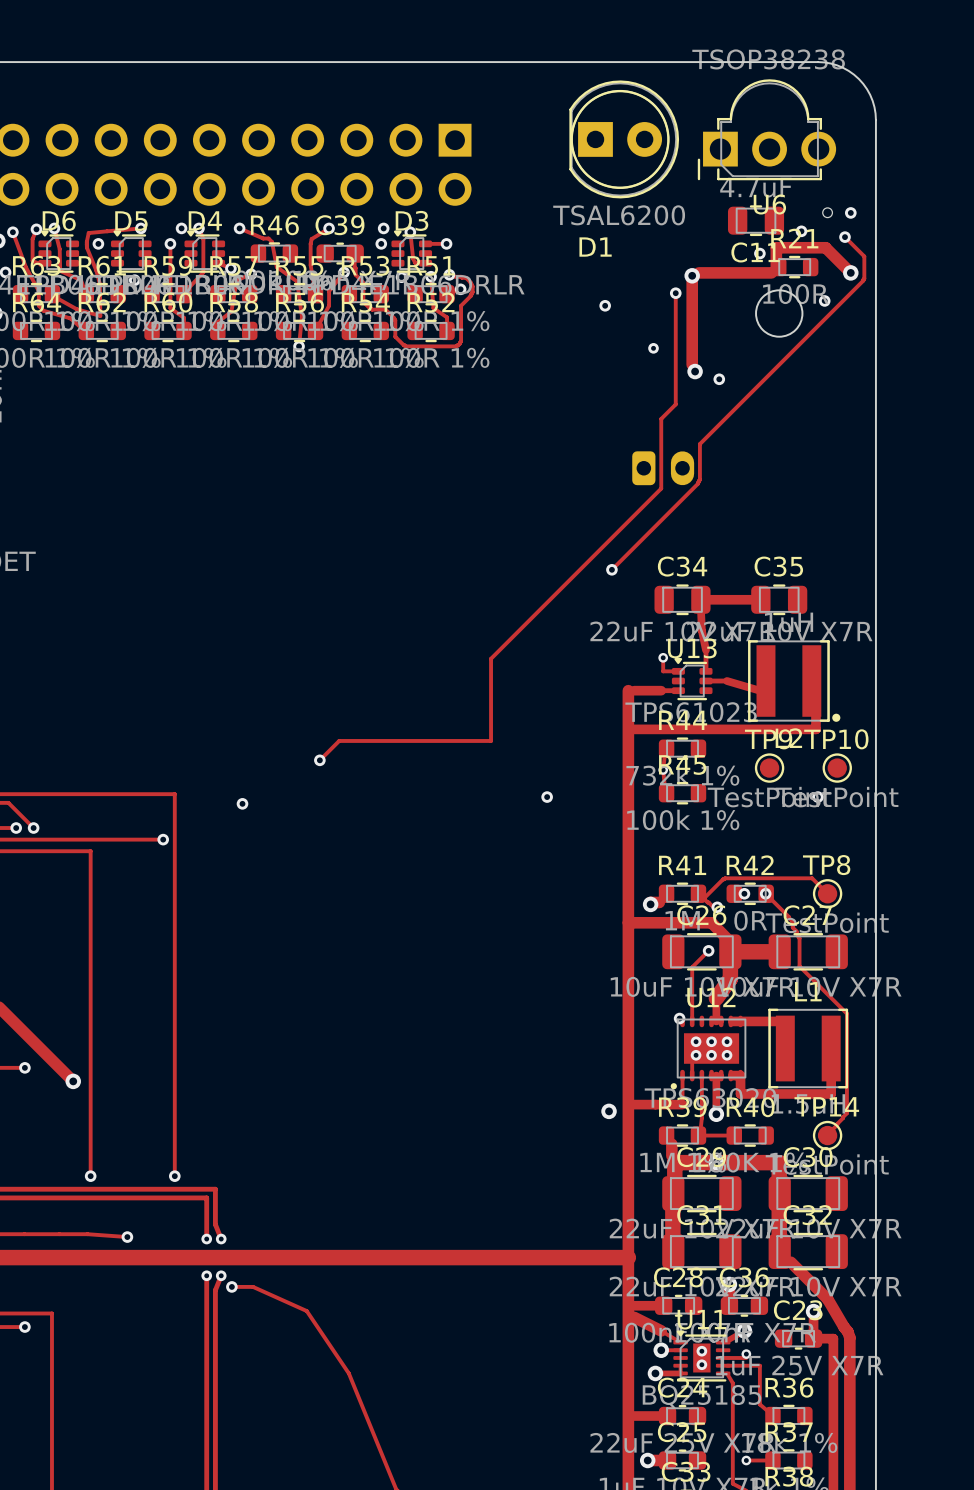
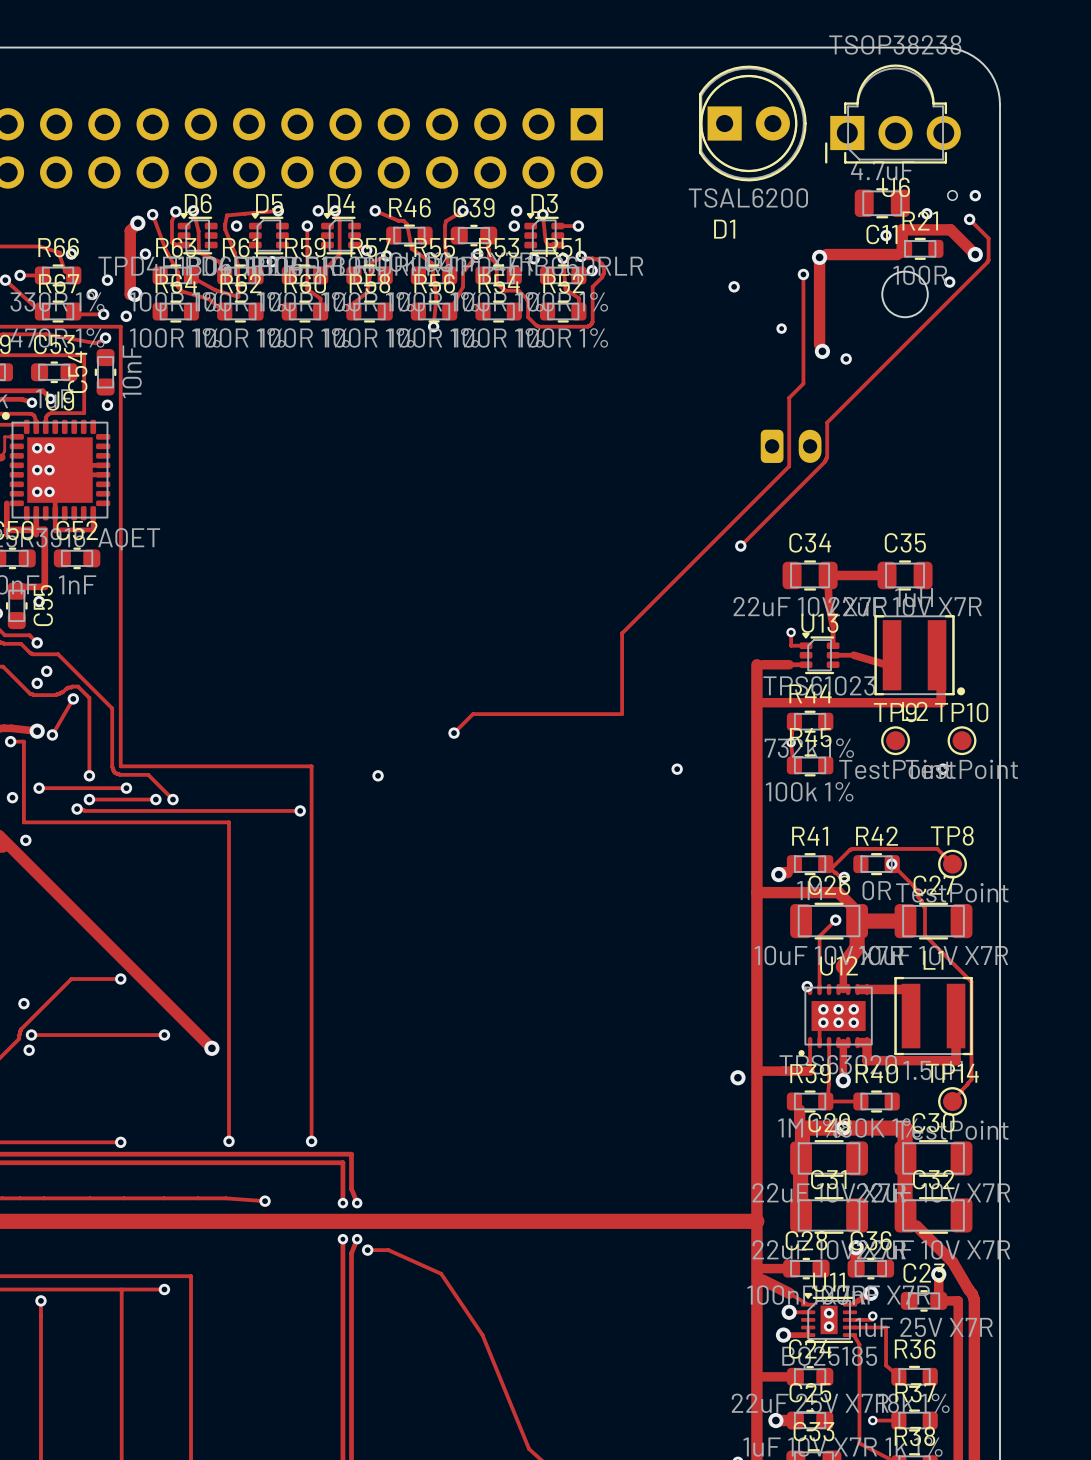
via: (744, 893) -> none

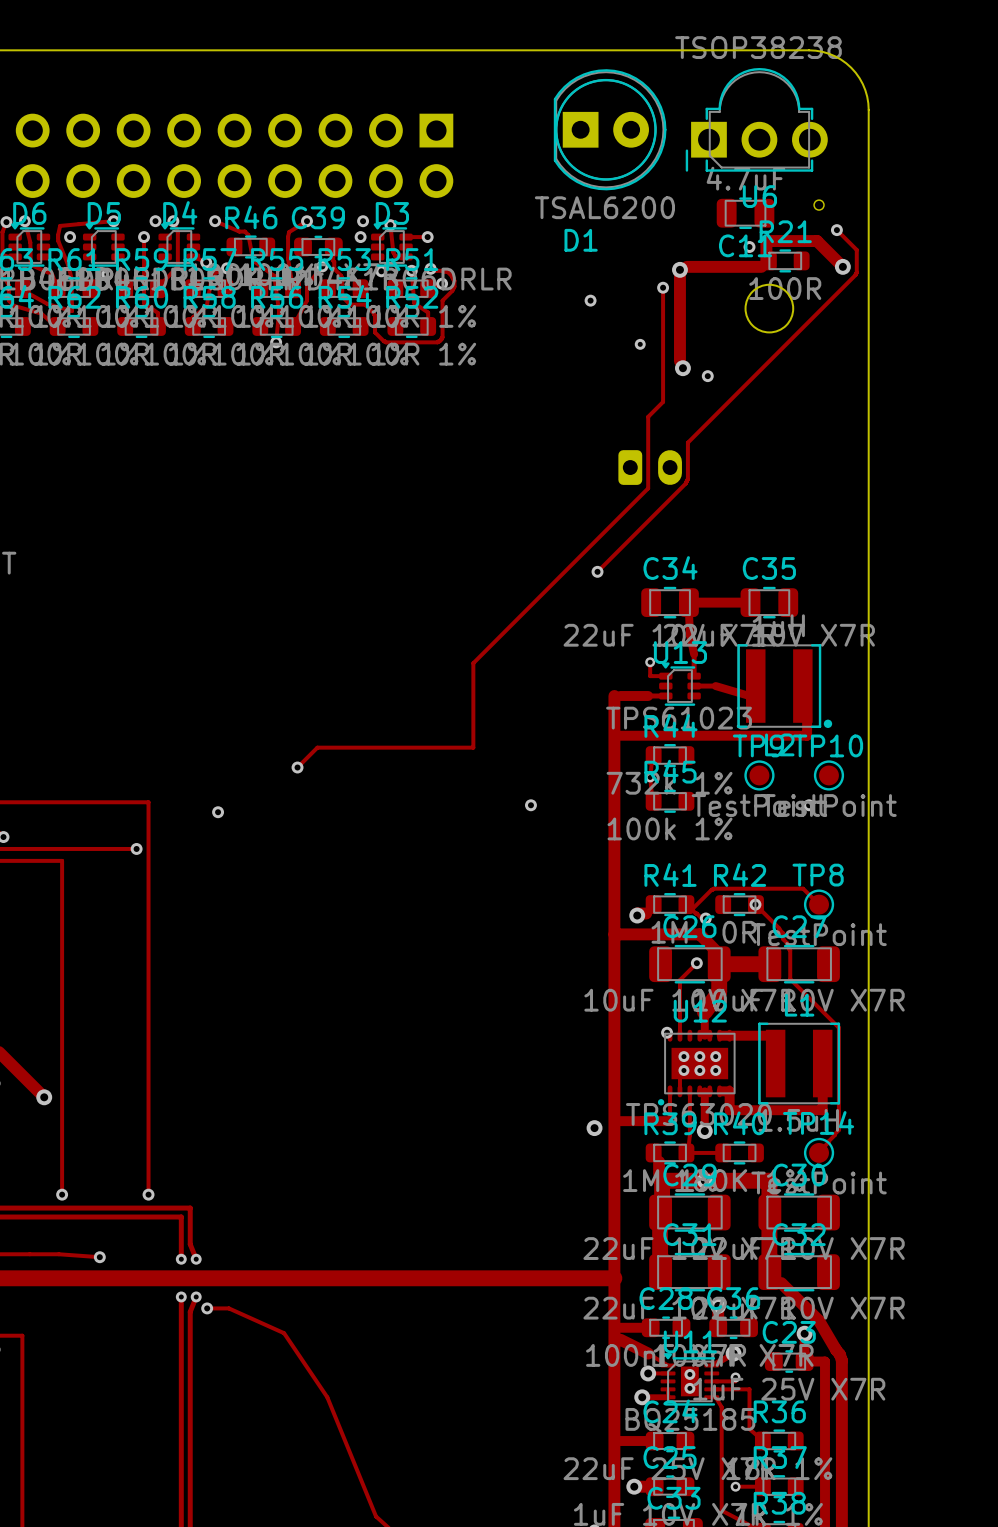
via: (975, 195) -> none
via: (926, 213) -> none
via: (949, 282) -> none

